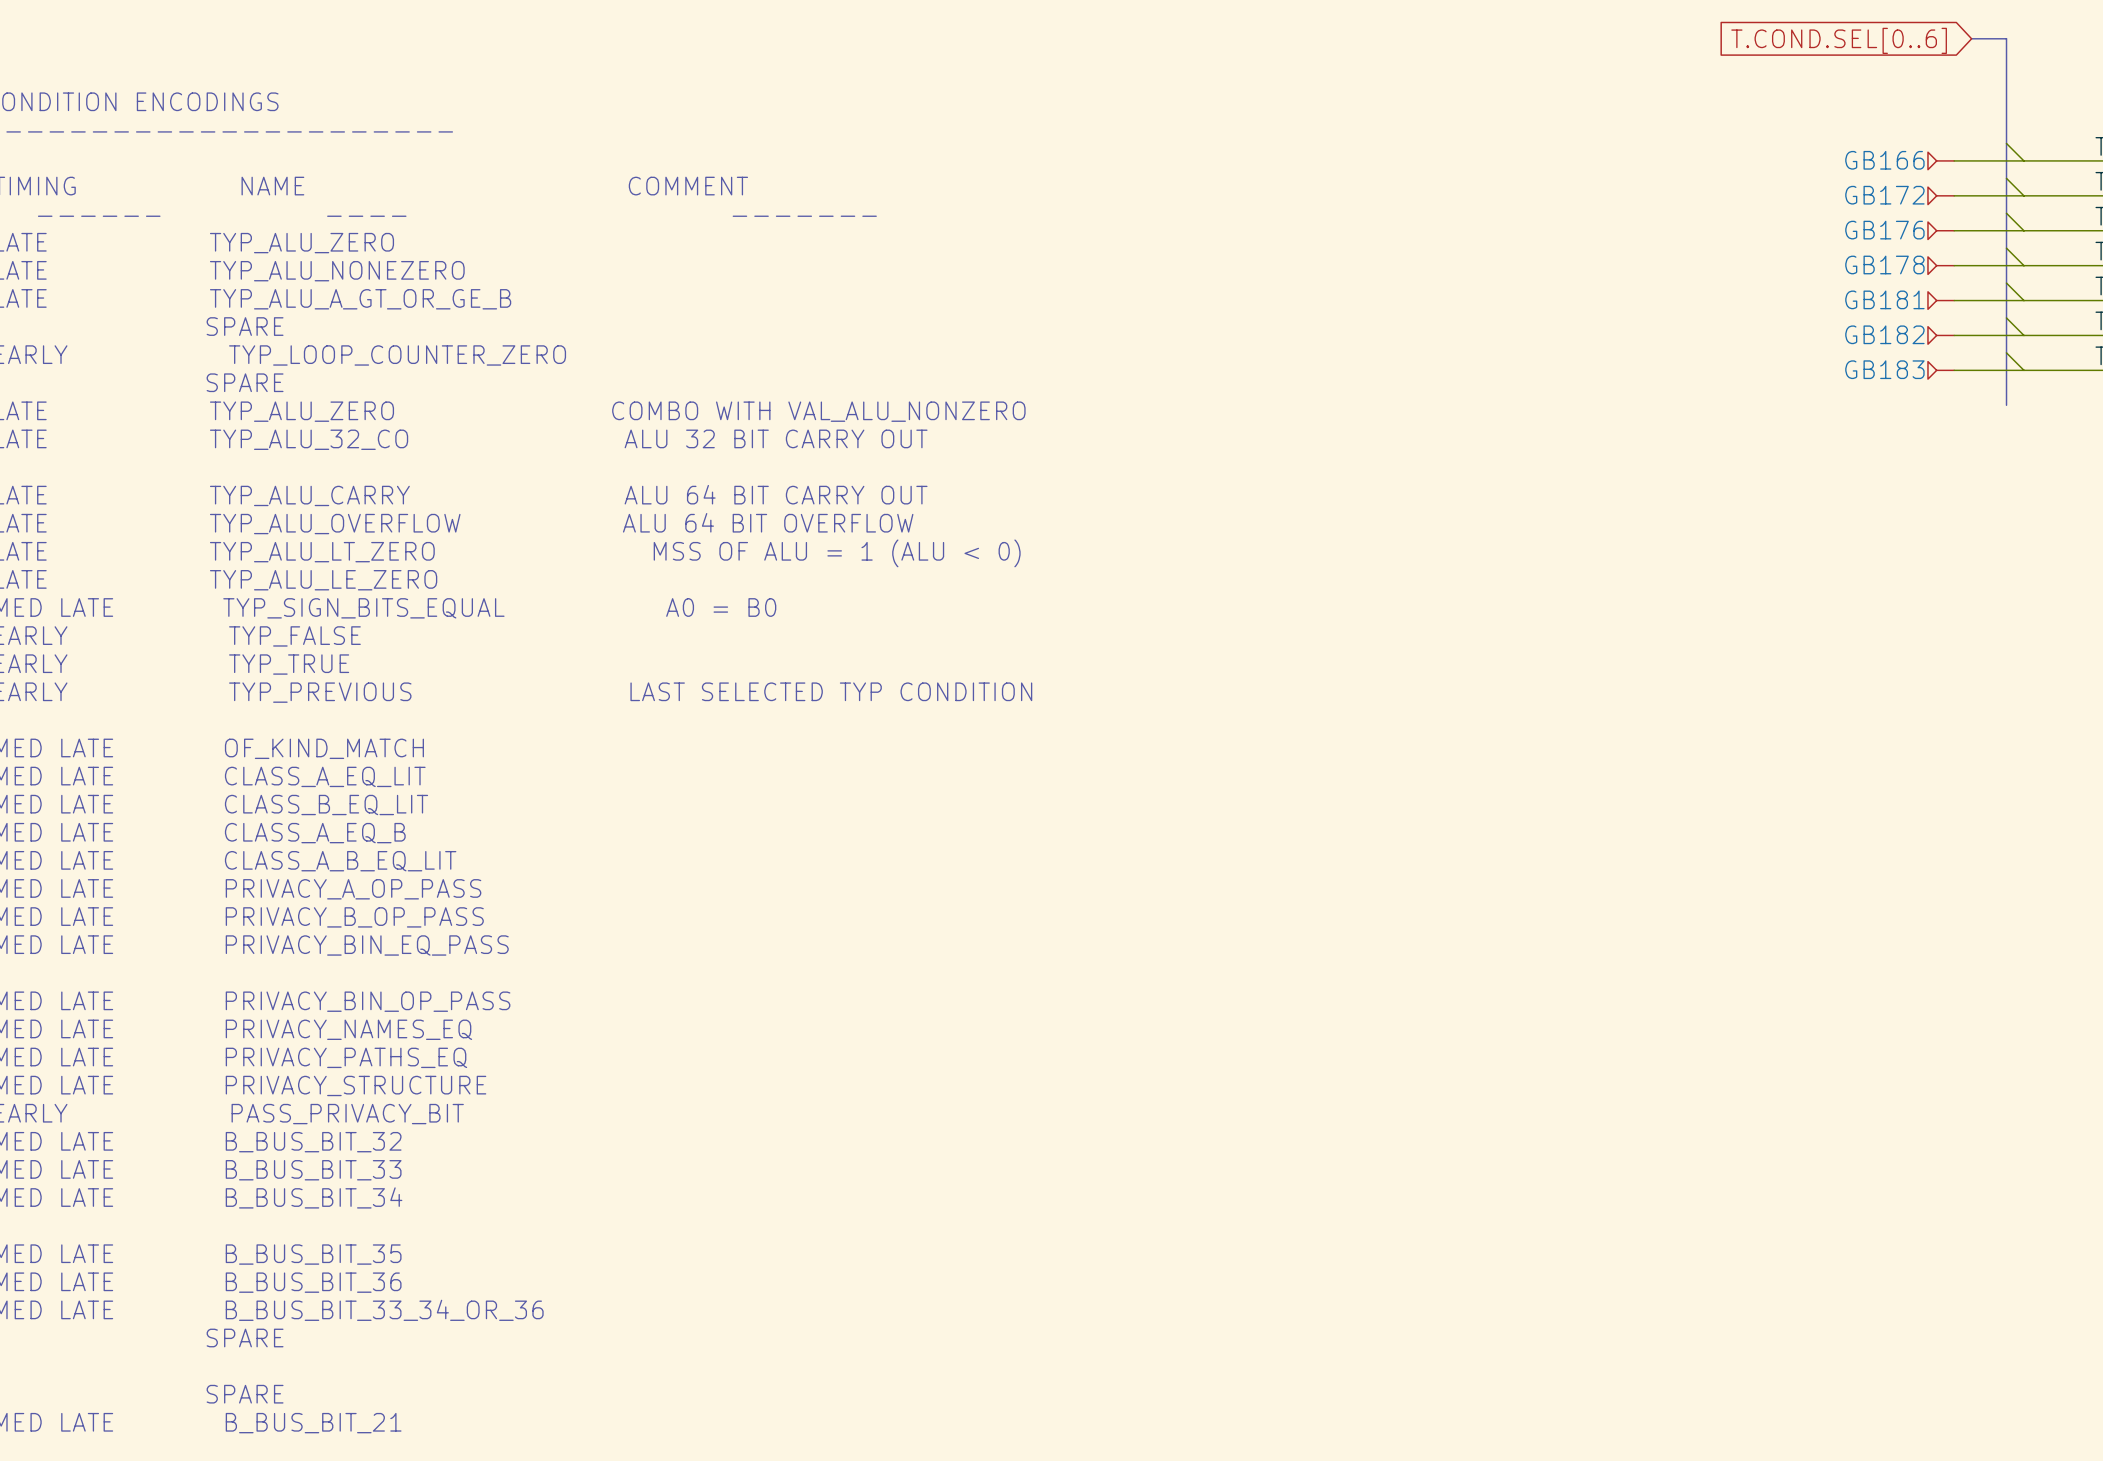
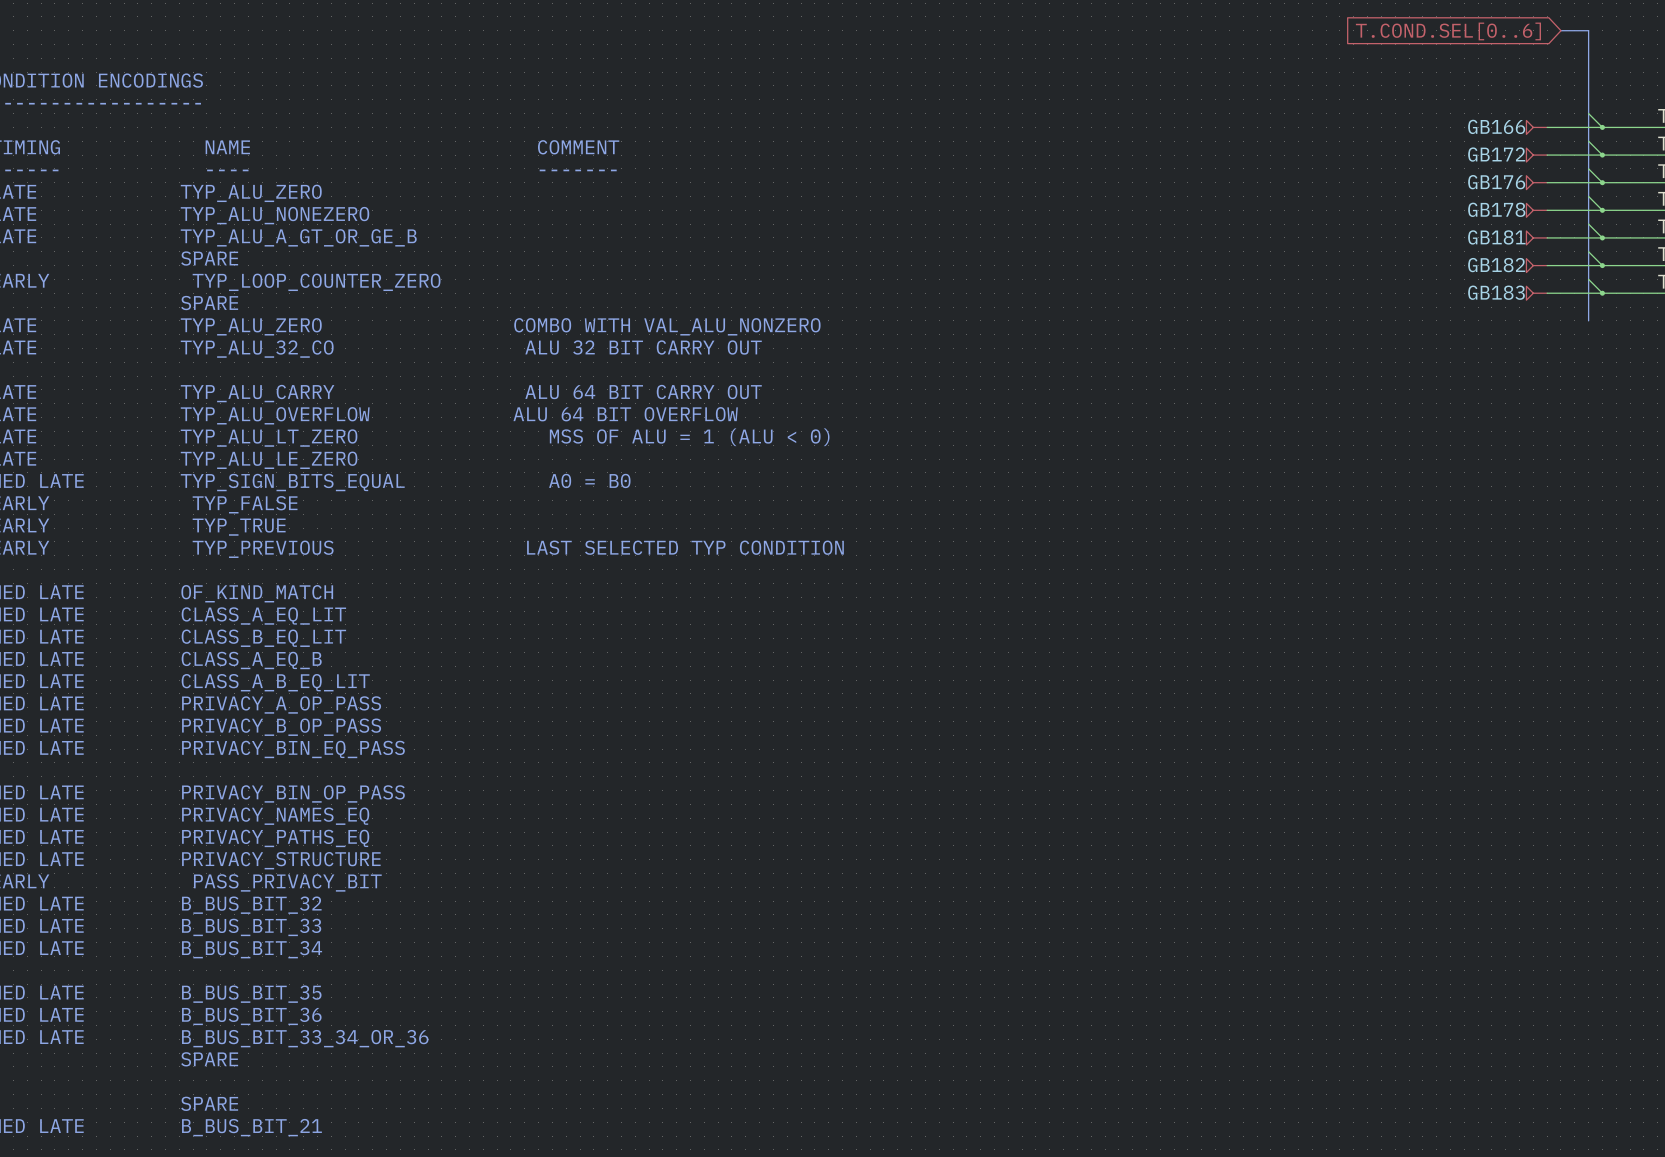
junction: none -> (1602, 127)
junction: none -> (1602, 155)
junction: none -> (1602, 182)
junction: none -> (1602, 210)
junction: none -> (1602, 237)
junction: none -> (1602, 265)
junction: none -> (1602, 293)

